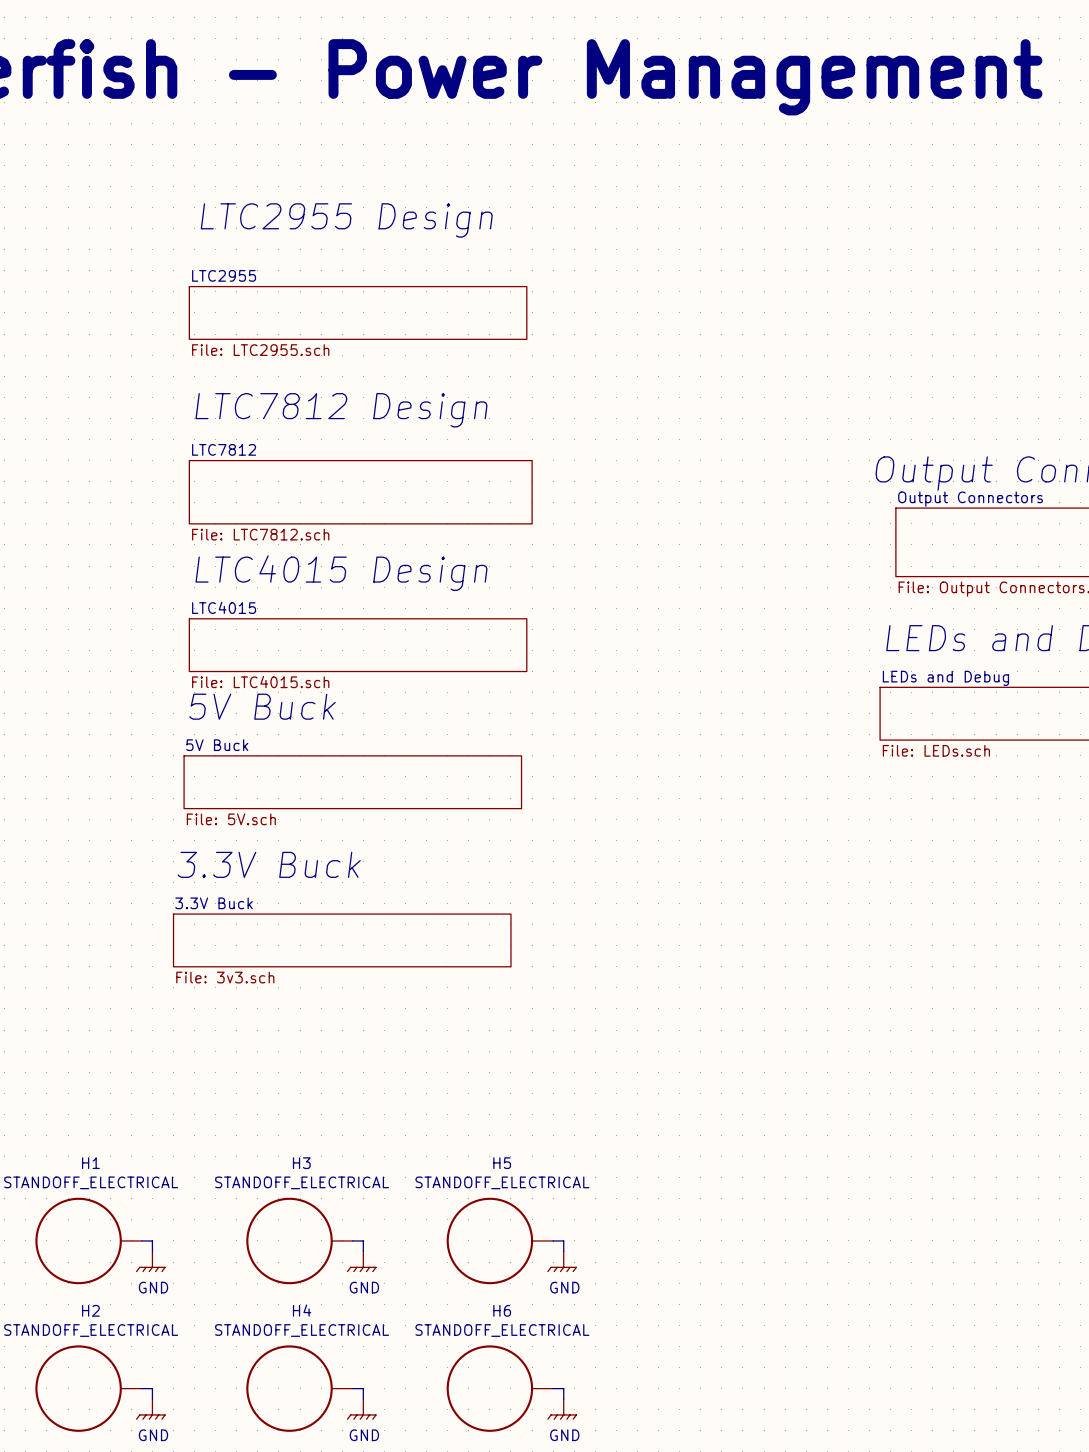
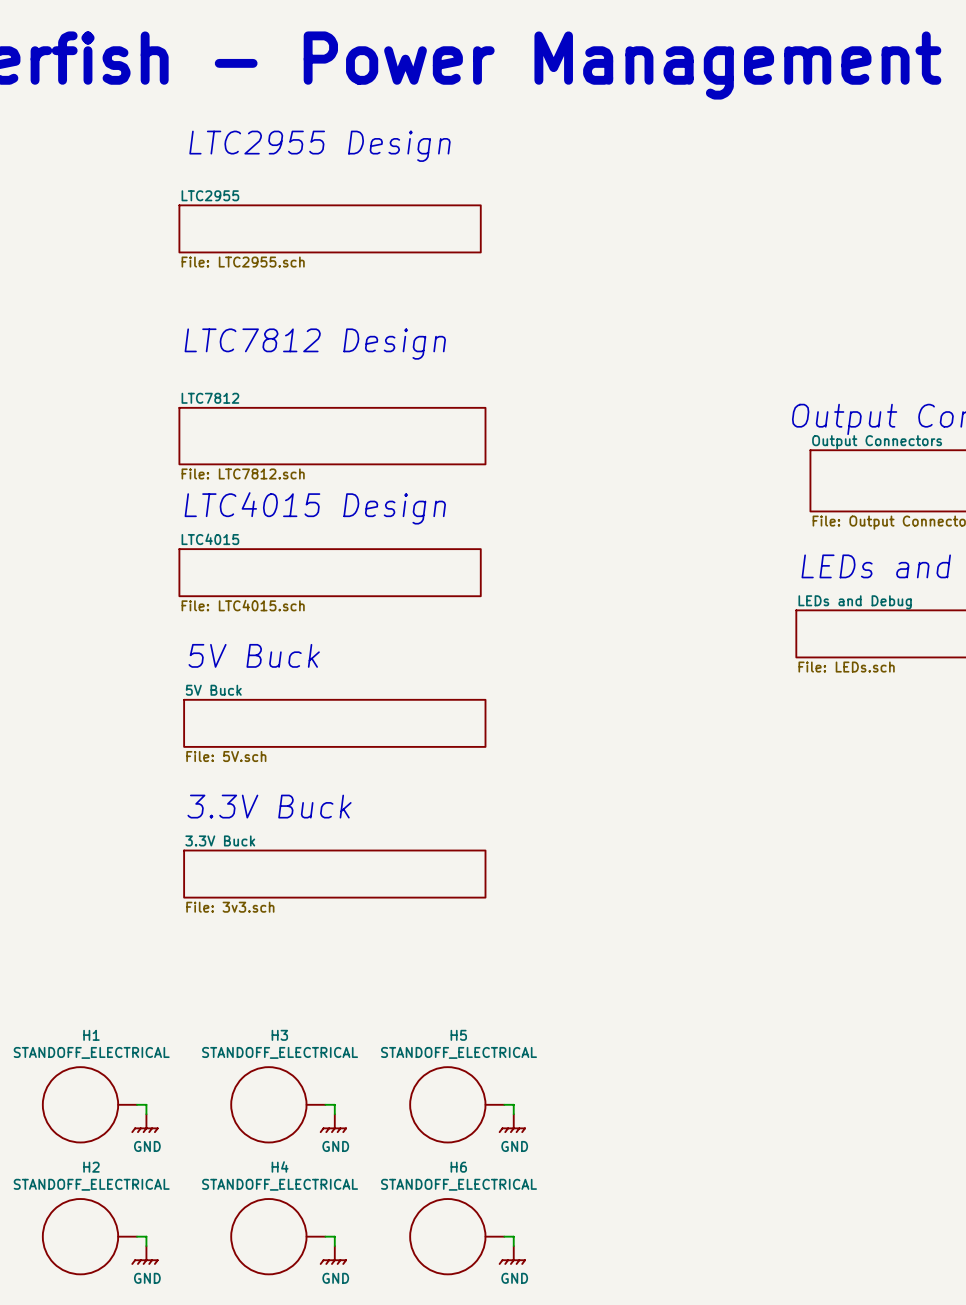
text position: LTC2955 Design (346, 220) -> LTC2955 Design (320, 146)
sheet LTC2955 position: (358, 312) -> (330, 228)
text position: LTC7812 Design (341, 410) -> LTC7812 Design (315, 344)
text position: 5V Buck (262, 706) -> 5V Buck (254, 655)
sheet 5V Buck position: (352, 782) -> (334, 723)
text position: 3.3V Buck (269, 864) -> 3.3V Buck (269, 806)
sheet 3.3V Buck position: (342, 940) -> (334, 874)

